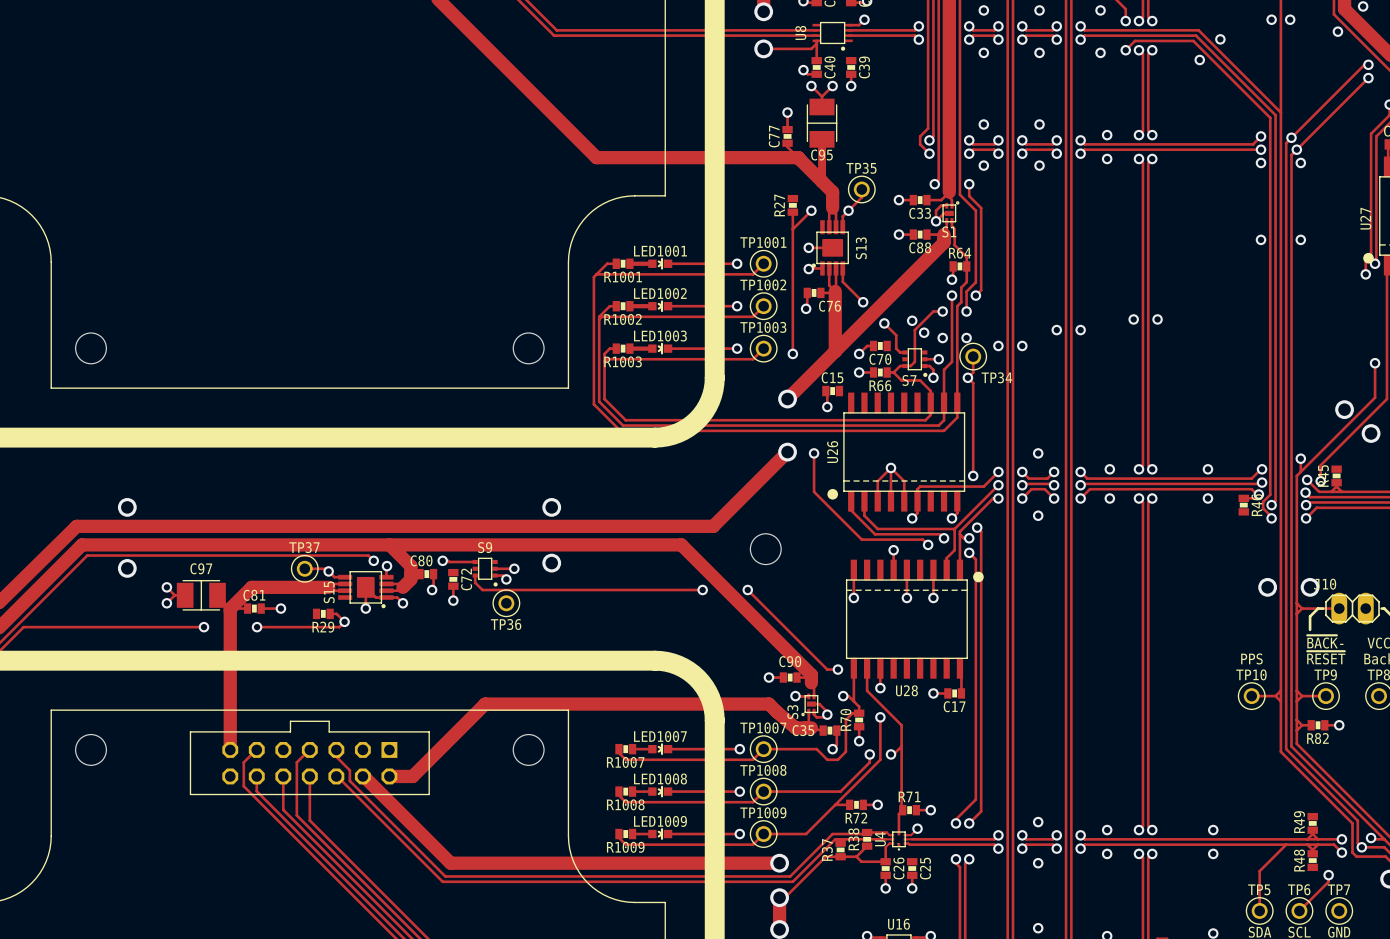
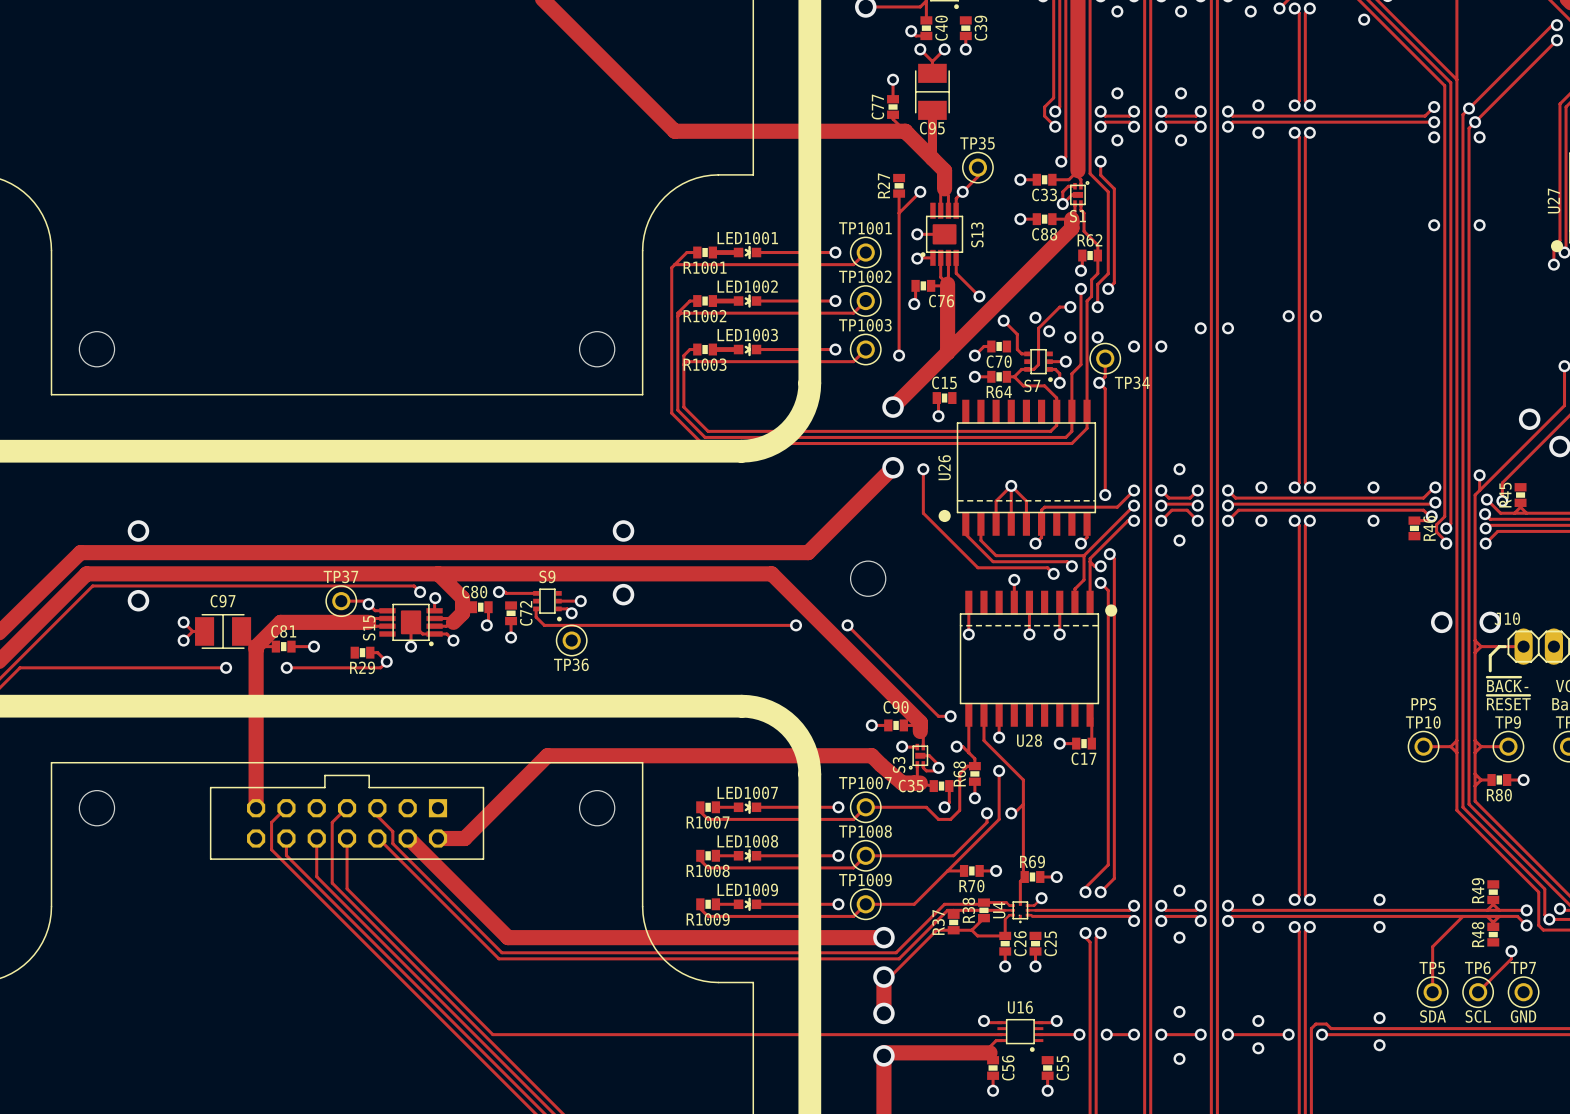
R64 name: R64 (960, 253) -> R62 (1089, 240)
R66 name: R66 (880, 385) -> R64 (999, 391)
R70 name: R70 (845, 719) -> R68 (959, 773)
R82 name: R82 (1317, 738) -> R80 (1499, 795)
R71 name: R71 (909, 796) -> R69 (1032, 861)
R72 name: R72 (856, 818) -> R70 (971, 886)

